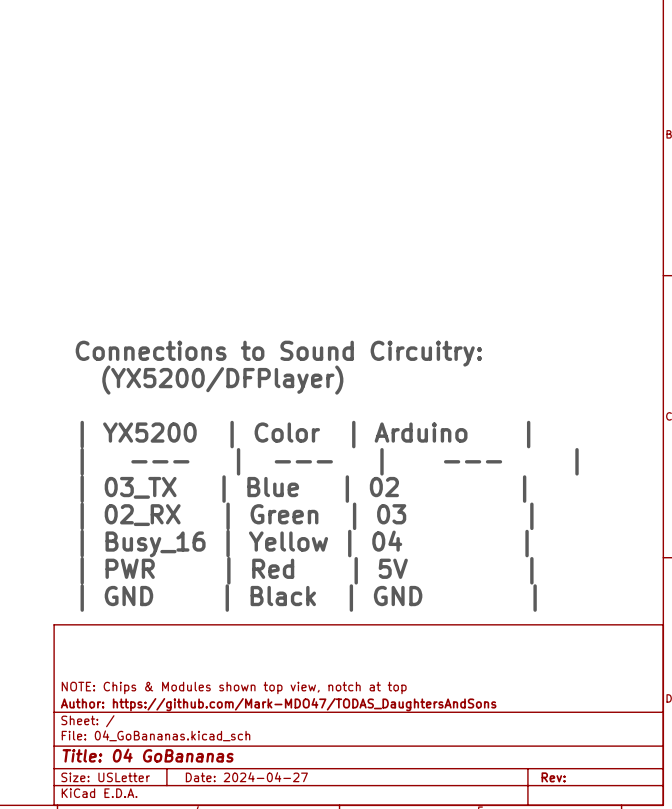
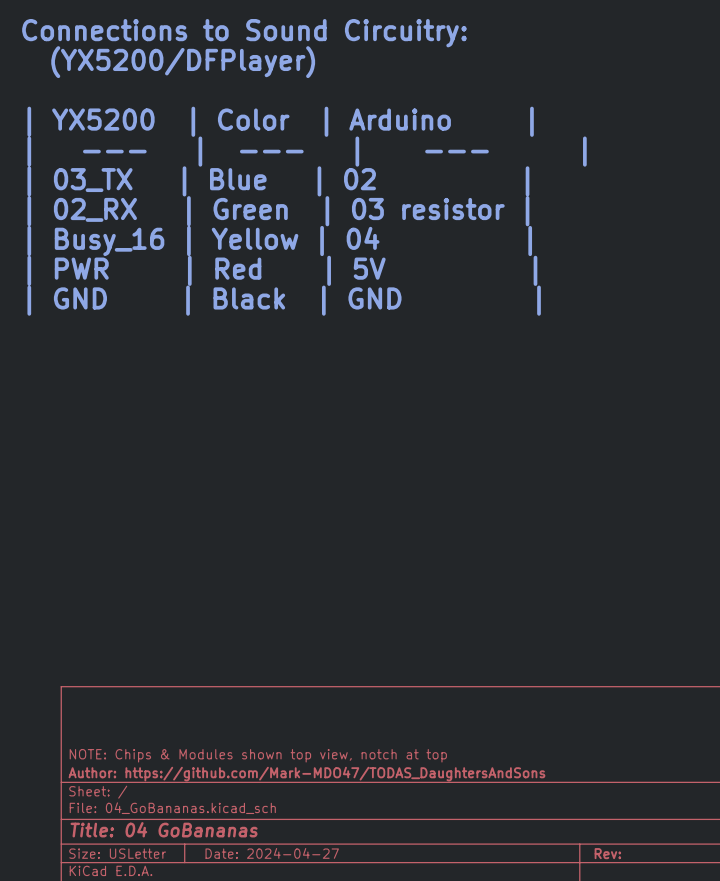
text: none -> Connections to Sound Circuitry: (244, 33)
text: none -> (YX5200/DFPlayer) (183, 62)
text: none -> | YX5200 | Color | Arduino | (280, 121)
text: none -> | --- | --- | --- | (307, 151)
text: none -> | 03_TX | Blue | 02 | (278, 181)
text: none -> | 02_RX | Green | 03 resistor | (278, 211)
text: none -> | Busy_16 | Yellow | 04 | (279, 241)
text: none -> | PWR | Red | 5V | (282, 270)
text: none -> | GND | Black | GND | (284, 300)
text: Connections to Sound Circuitry: (278, 353) -> none
text: (YX5200/DFPlayer) (222, 380) -> none
text: | YX5200 | Color | Arduino | (305, 434) -> none
text: | --- | --- | --- | (329, 461) -> none
text: | 03_TX | Blue | 02 | (303, 489) -> none
text: | 02_RX | Green | 03 | (307, 516) -> none
text: | Busy_16 | Yellow | 04 | (304, 543) -> none
text: | PWR | Red | 5V | (307, 570) -> none
text: | GND | Black | GND | (308, 598) -> none

